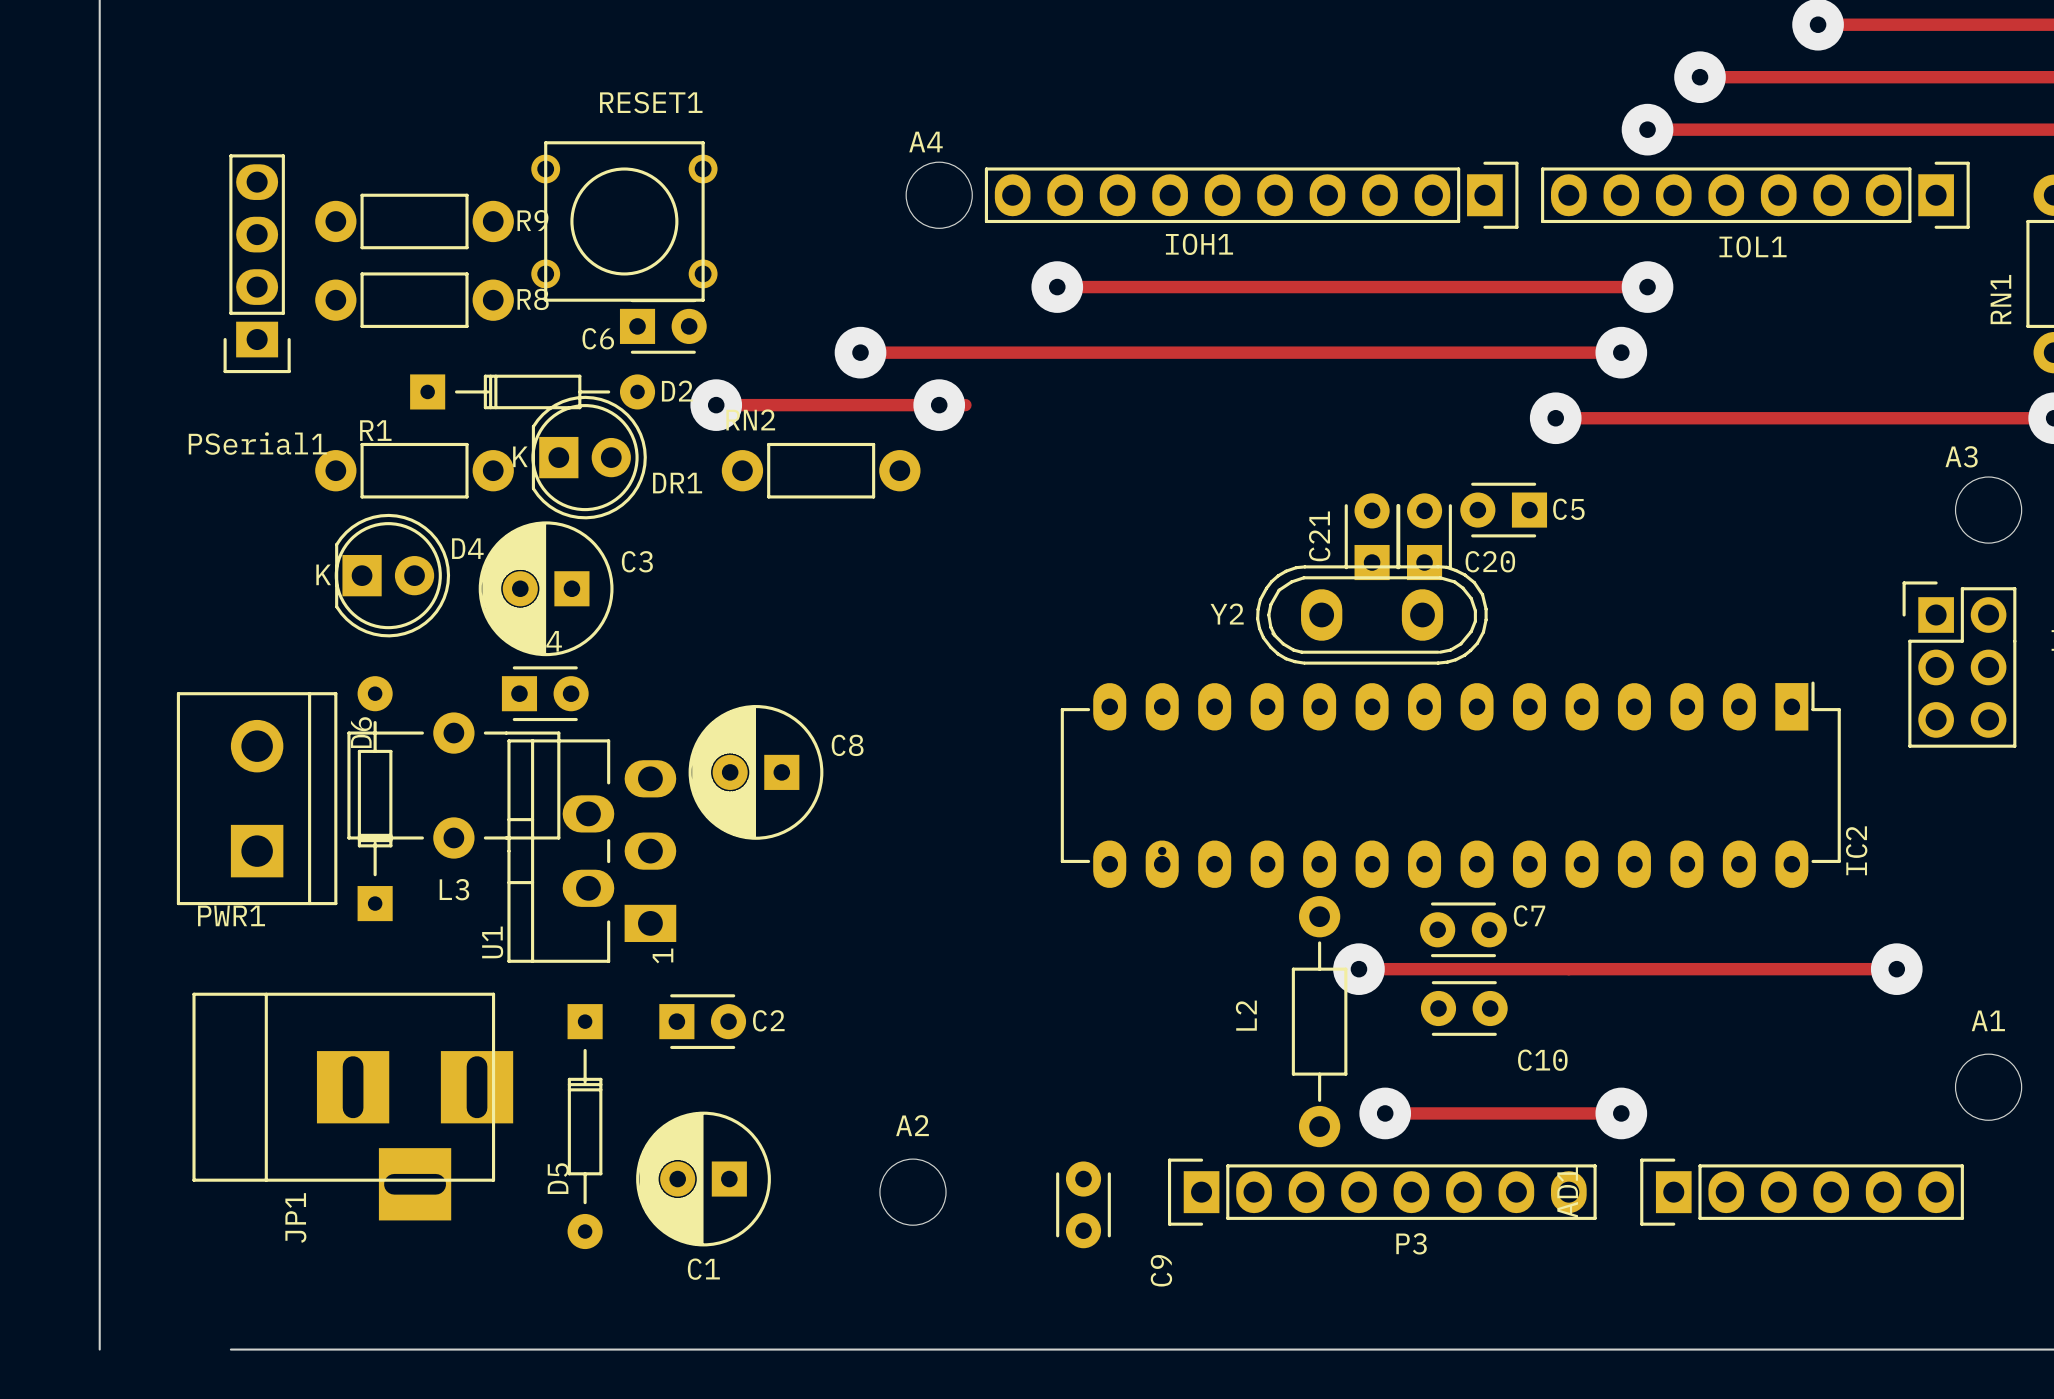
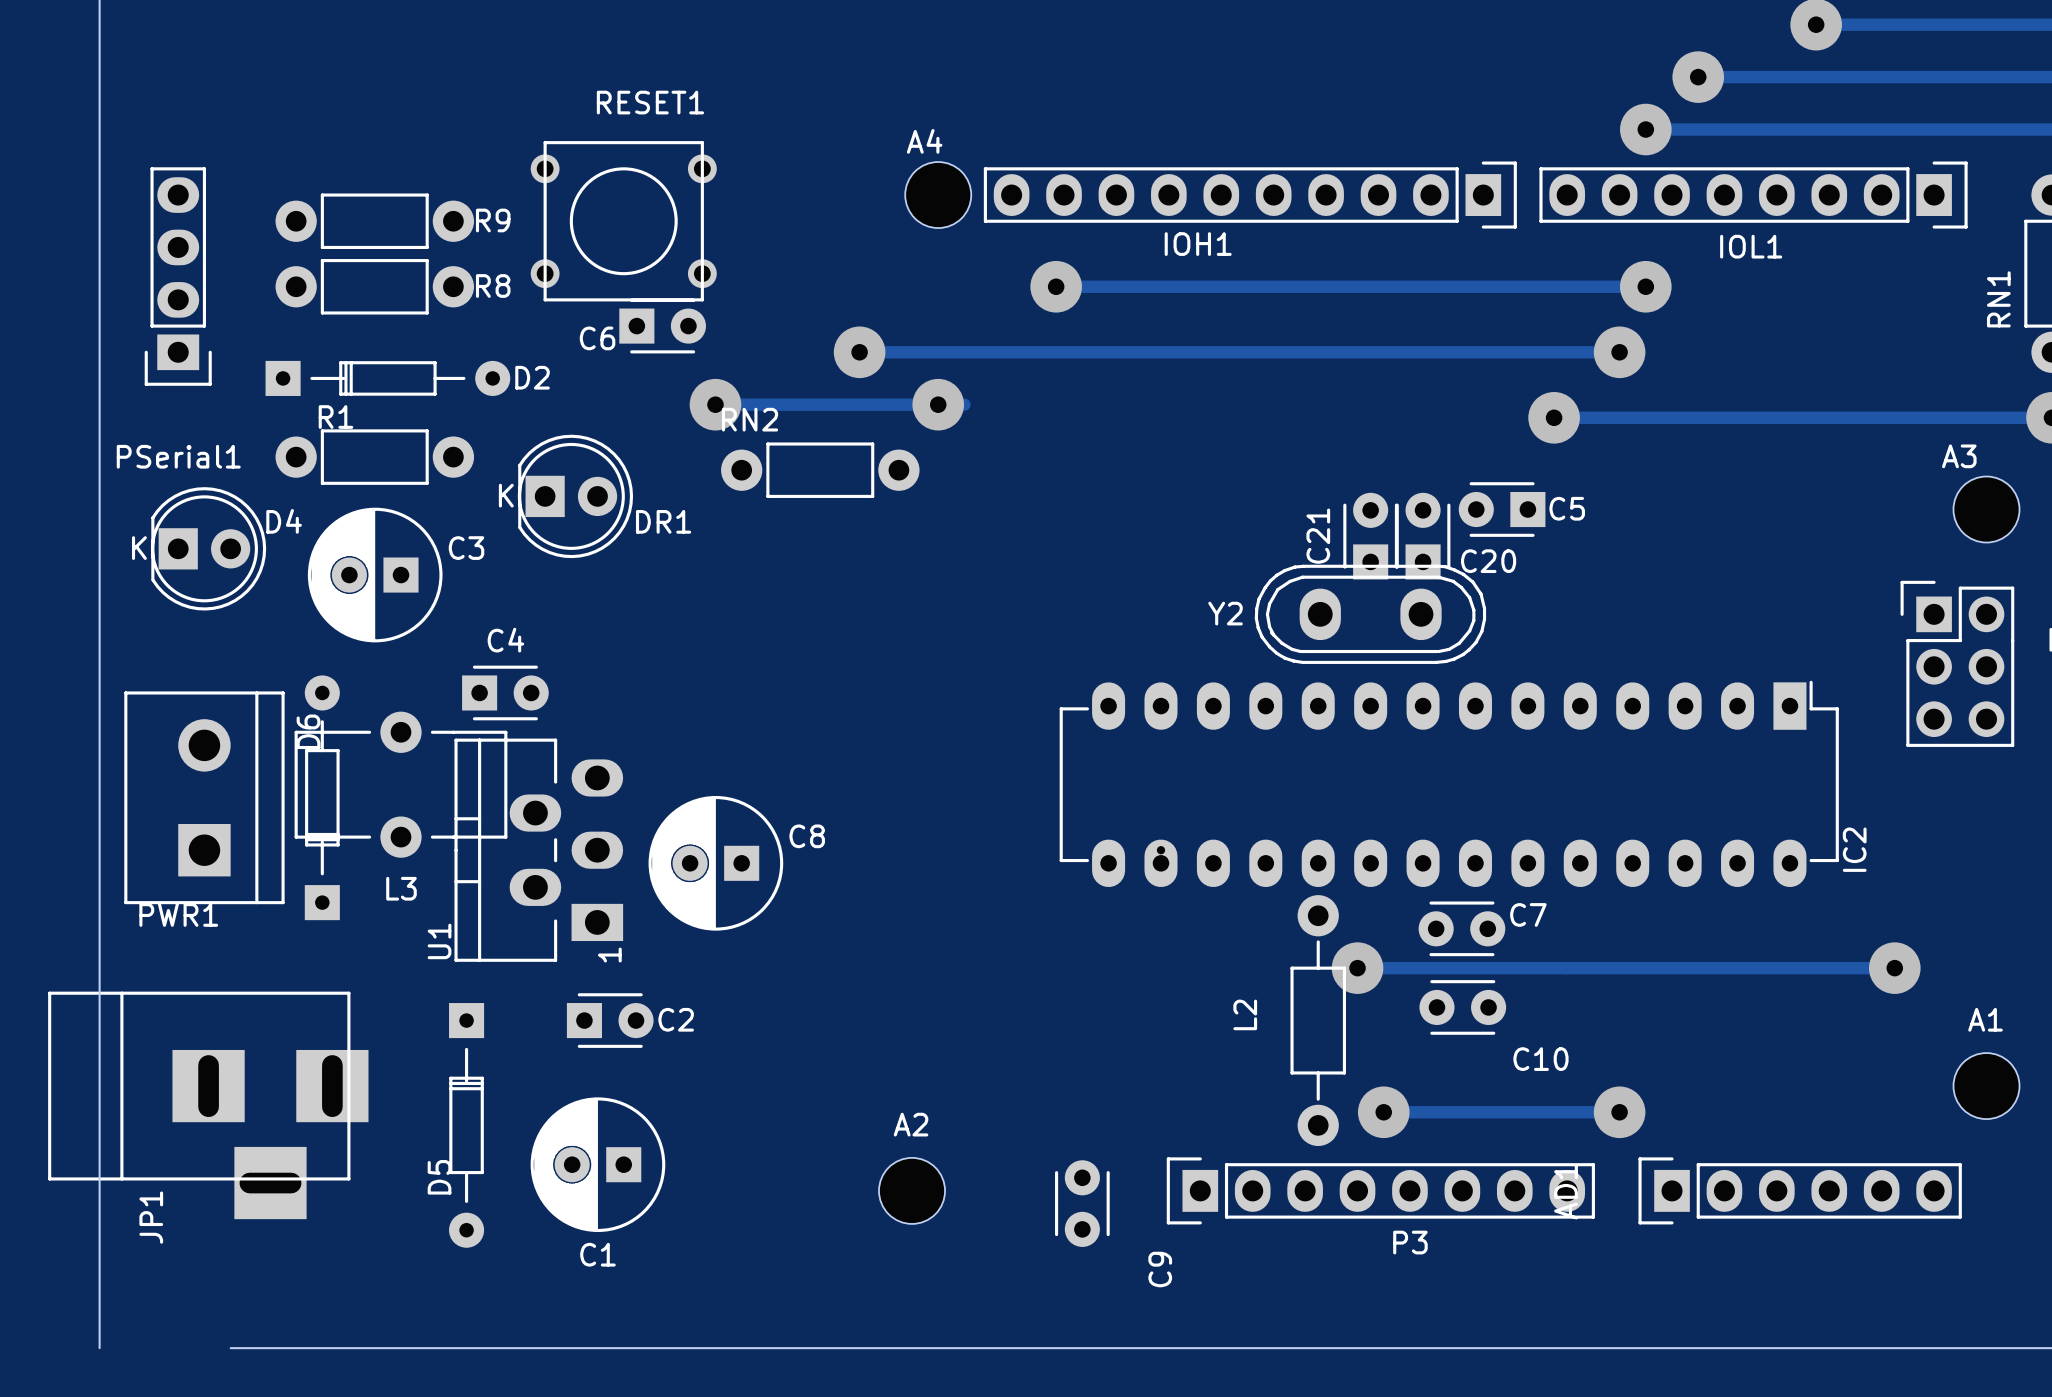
R9 position: (414, 221) -> (374, 221)
PSerial1 position: (257, 263) -> (178, 276)
R8 position: (414, 300) -> (374, 286)
D2 position: (532, 391) -> (387, 378)
DR1 position: (589, 457) -> (575, 496)
R1 position: (414, 470) -> (374, 457)
D4 position: (392, 575) -> (208, 548)
C3 position: (546, 588) -> (375, 575)
C4 position: (545, 693) -> (505, 692)
C8 position: (755, 772) -> (715, 863)
L3 position: (453, 785) -> (400, 784)
PWR1 position: (257, 798) -> (204, 797)
D6 position: (375, 798) -> (322, 797)
U1 position: (591, 851) -> (538, 850)
C2 position: (702, 1021) -> (610, 1020)
JP1 position: (352, 1106) -> (208, 1105)
D5 position: (585, 1126) -> (466, 1125)
C1 position: (703, 1179) -> (597, 1164)

